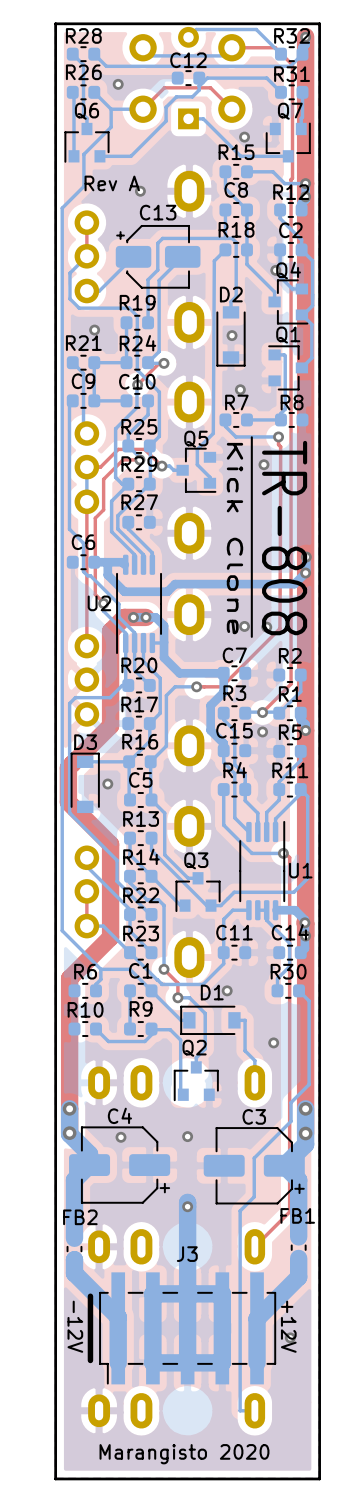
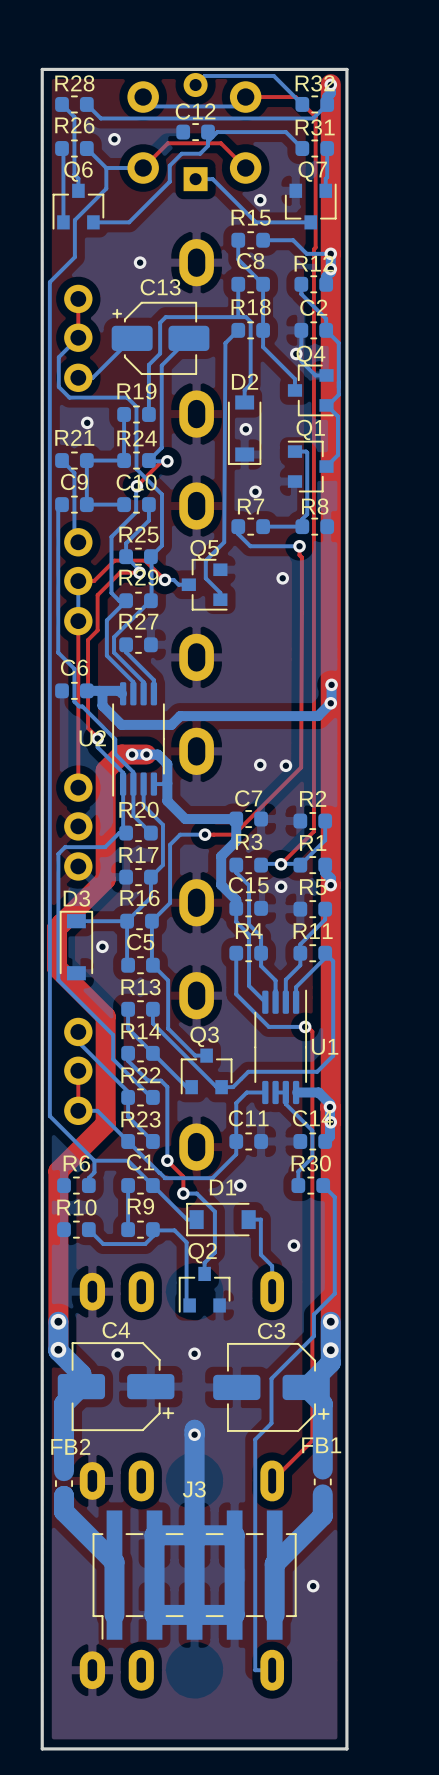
text: Rev A (112, 183) -> none
line: (251, 437) (251, 636) -> none
text: Kick Clone (234, 538) -> none
text: TR-808 (284, 538) -> none
line: (90, 1296) (90, 1360) -> none
text: -12V (75, 1326) -> none
text: +12V (288, 1326) -> none
text: Marangisto 2020 (184, 1454) -> none

